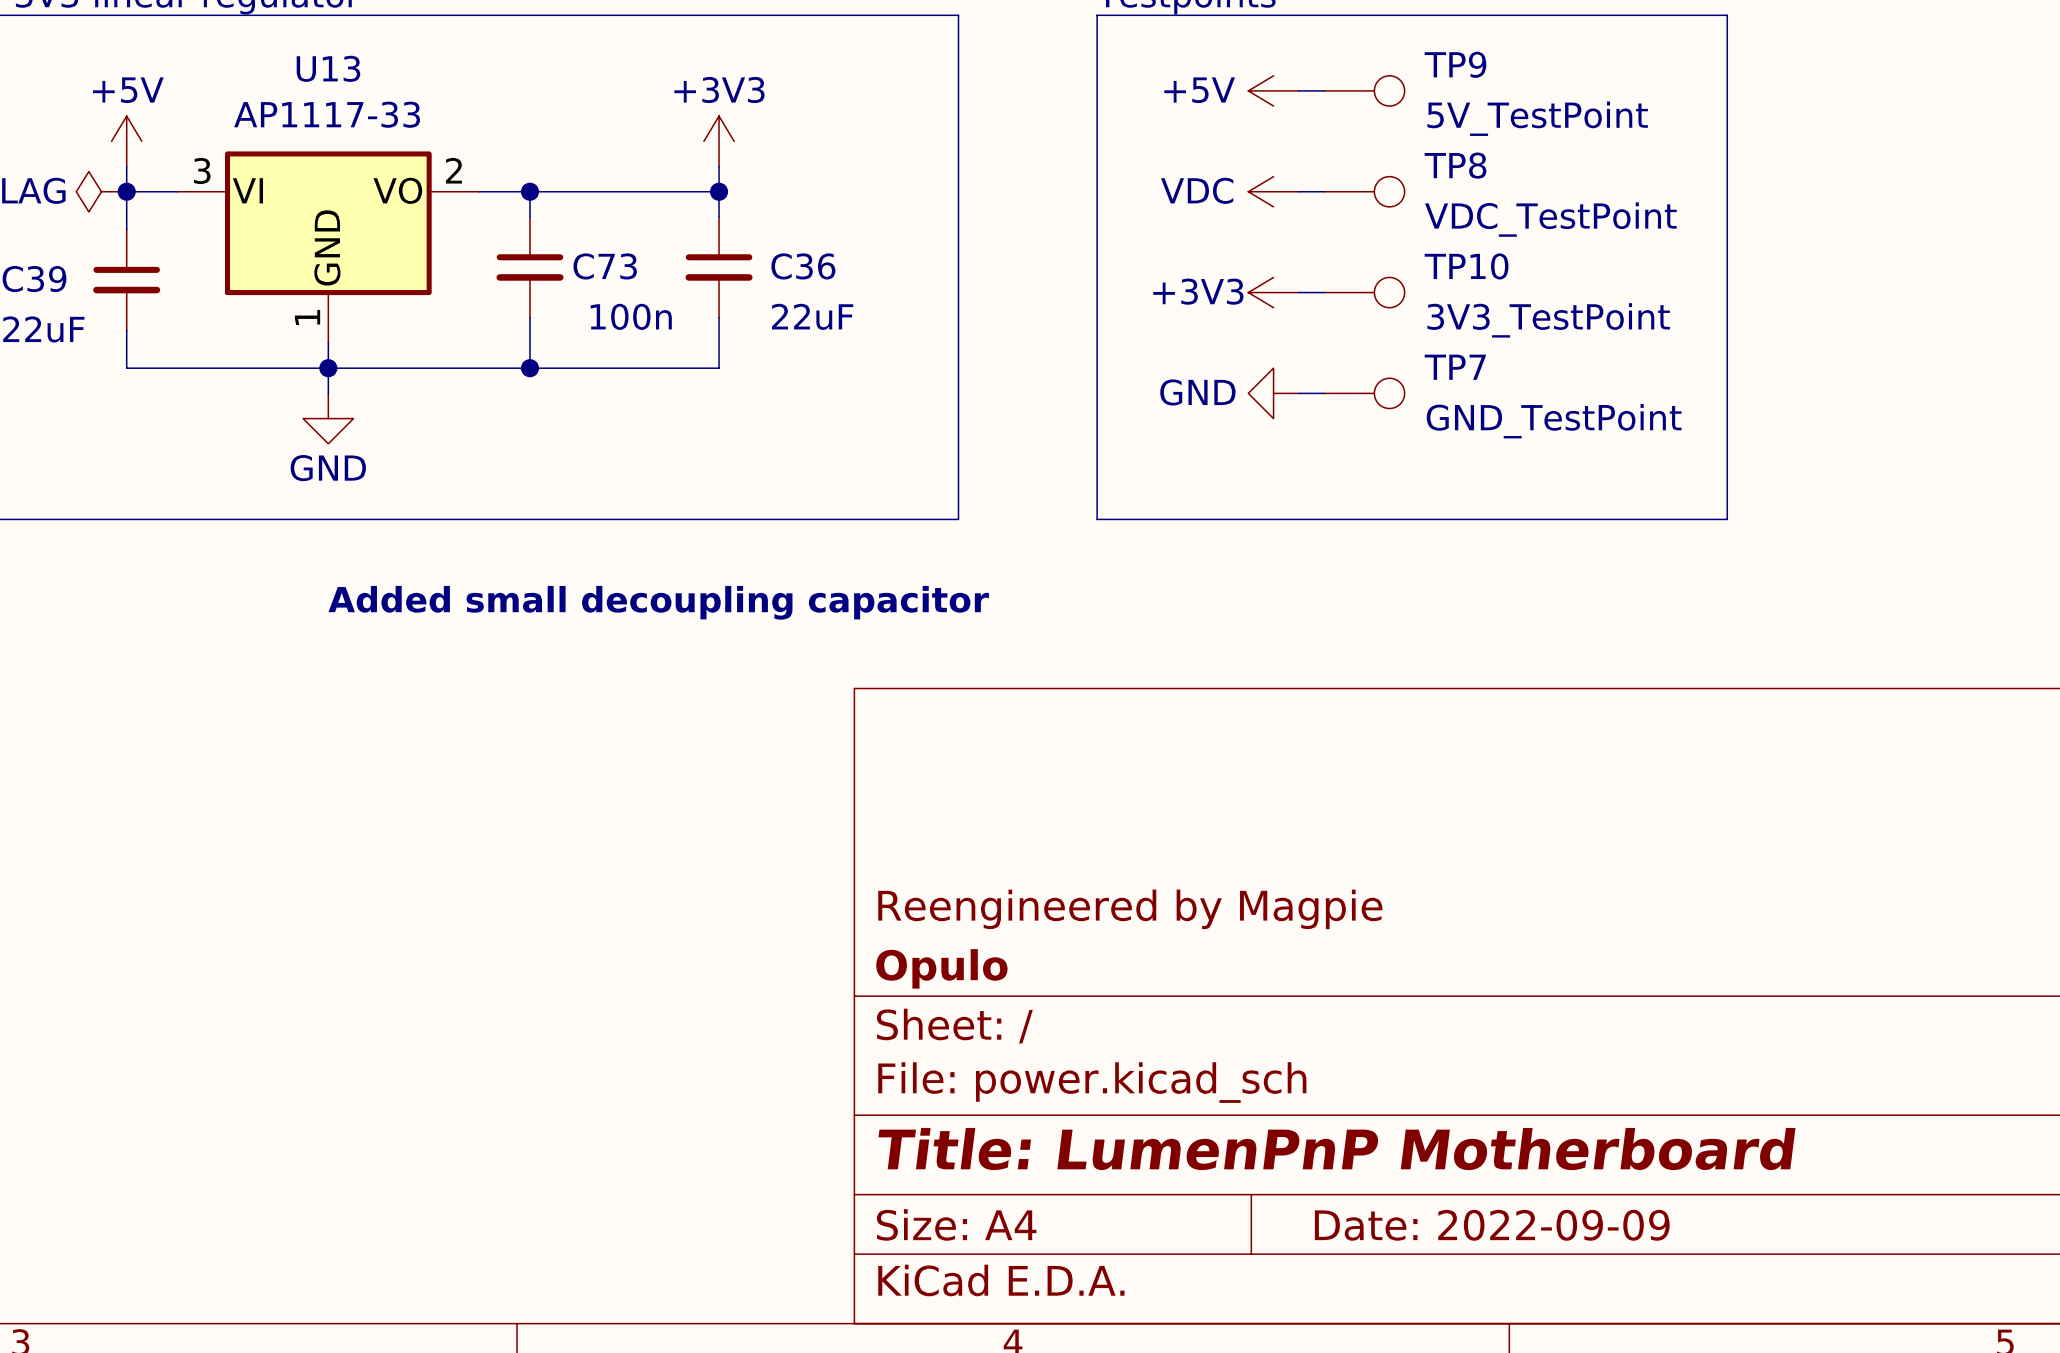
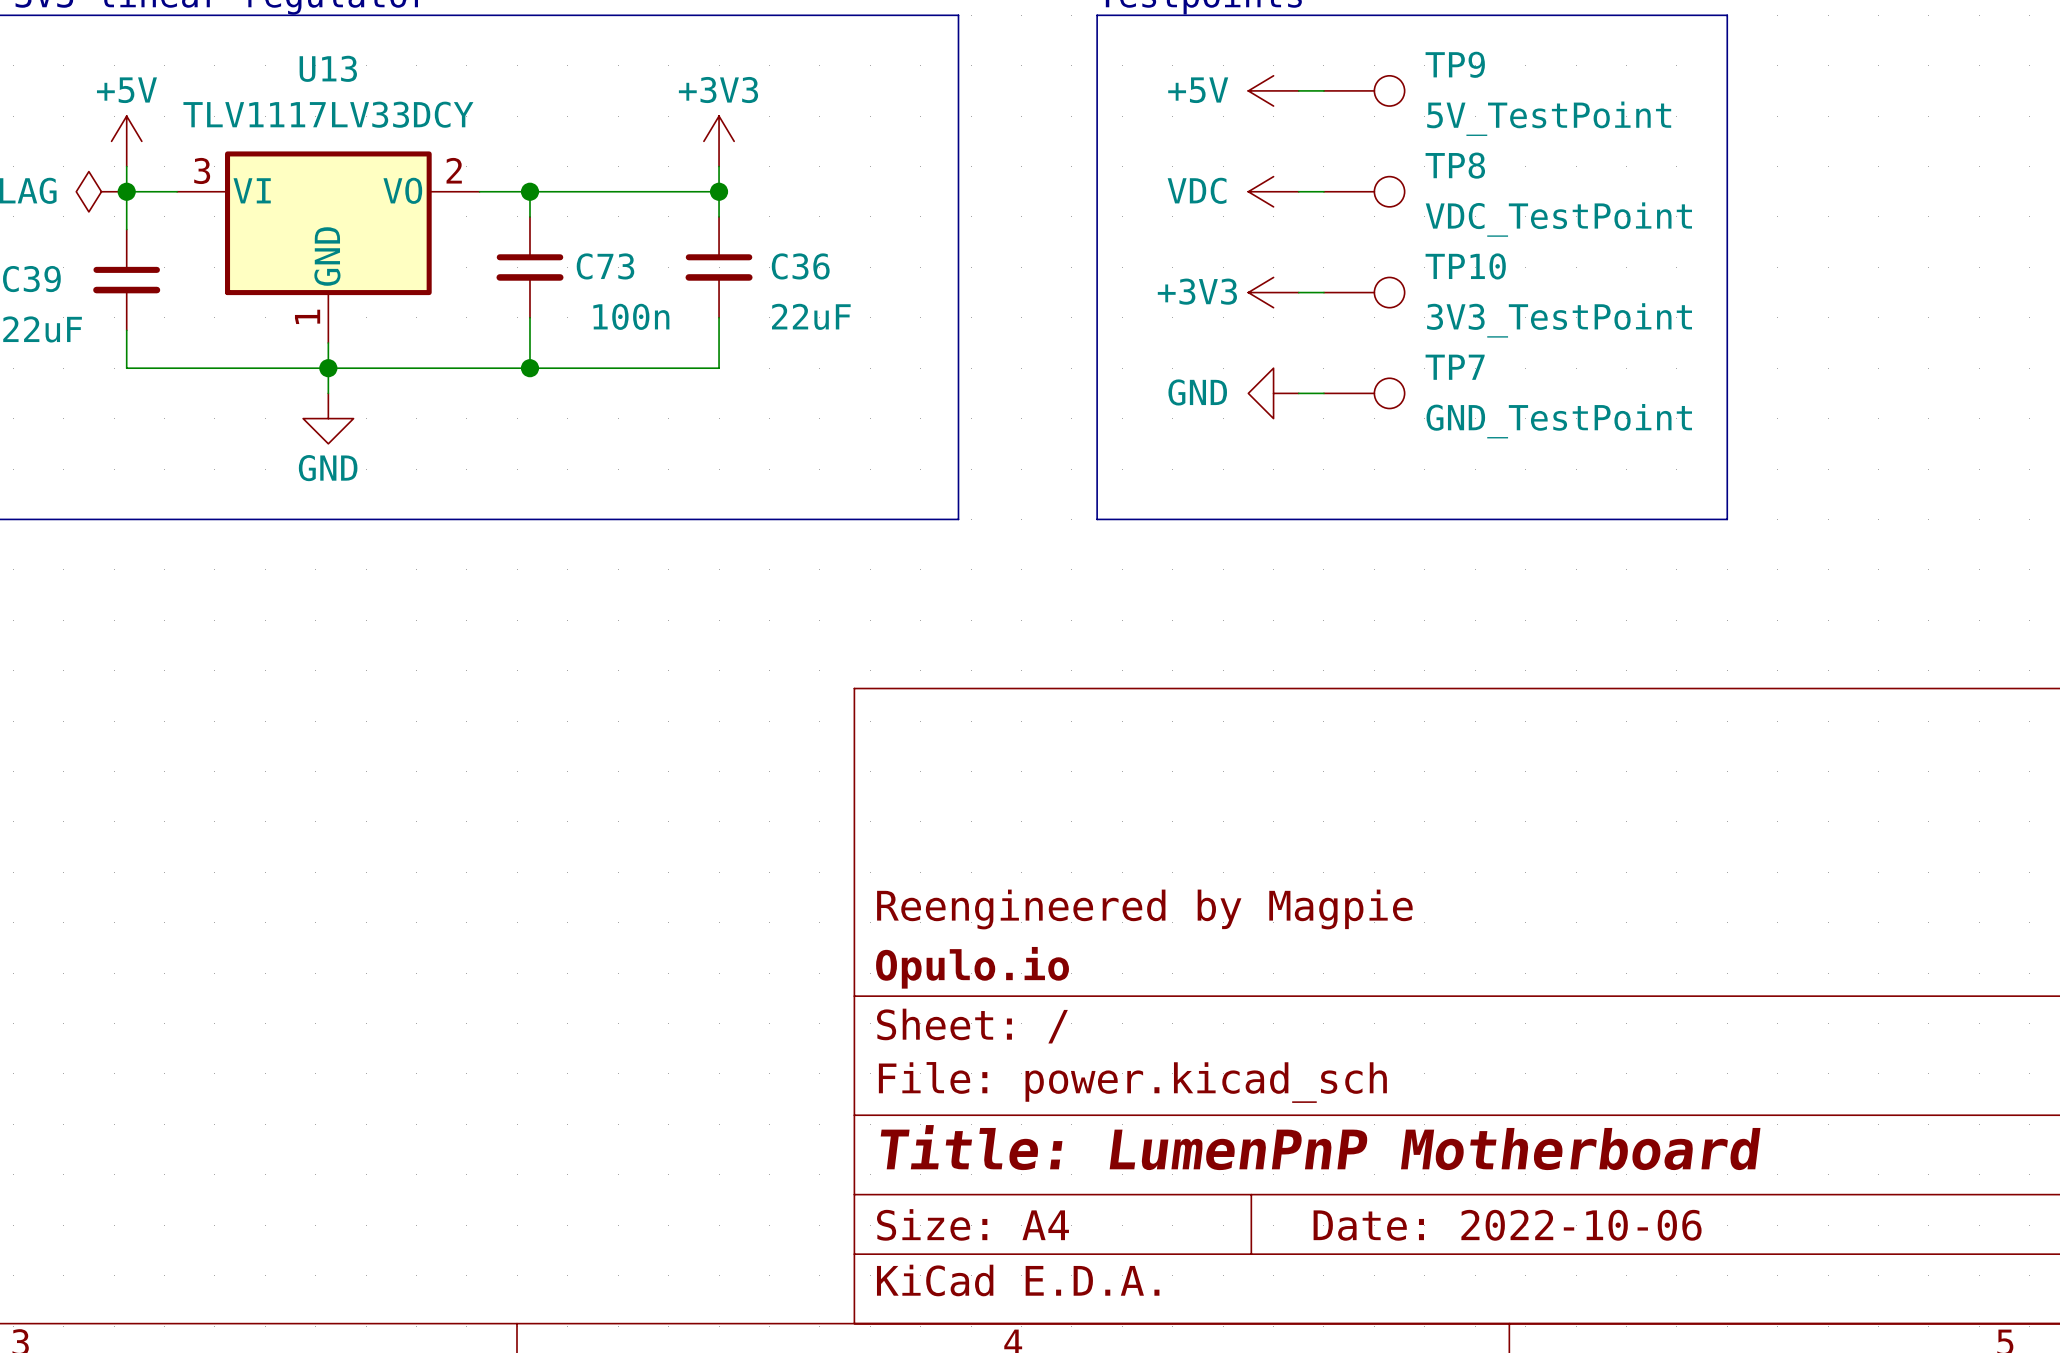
U13 value: AP1117-33 (327, 114) -> TLV1117LV33DCY (328, 114)
text: Added small decoupling capacitor (658, 602) -> none
title block: Opulo (941, 968) -> Opulo.io (972, 967)
title block: Date: 2022-09-09 (1492, 1225) -> Date: 2022-10-06 (1507, 1225)

